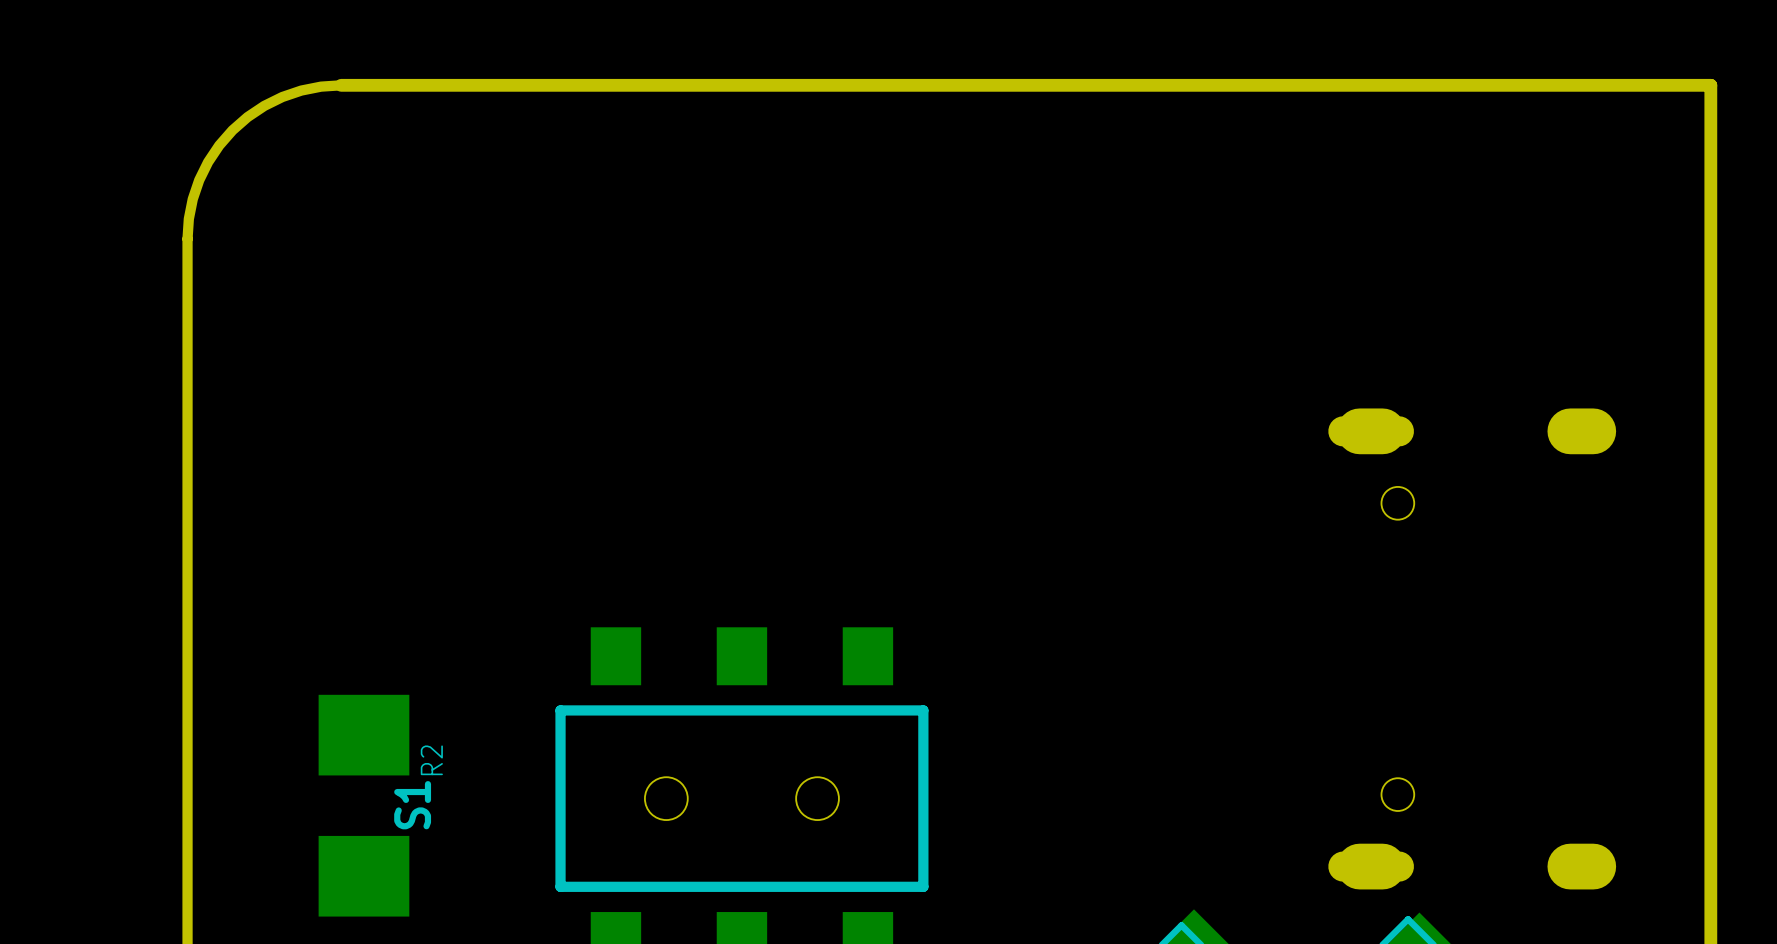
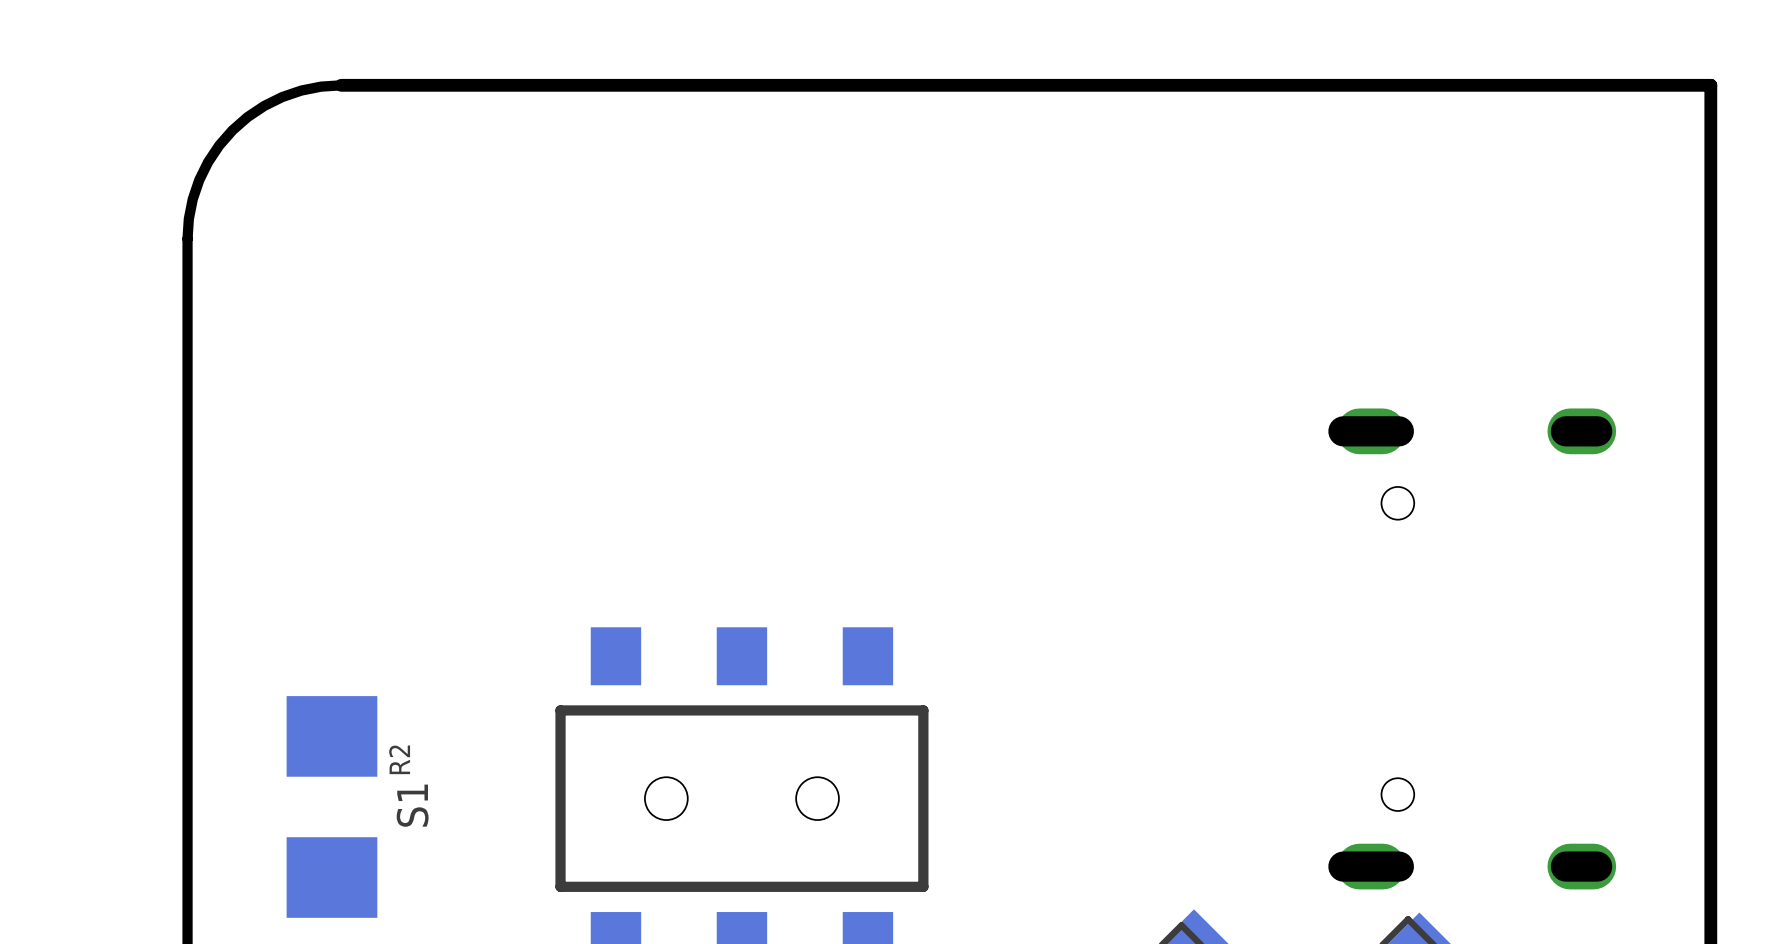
R2 position: (363, 805) -> (331, 806)

